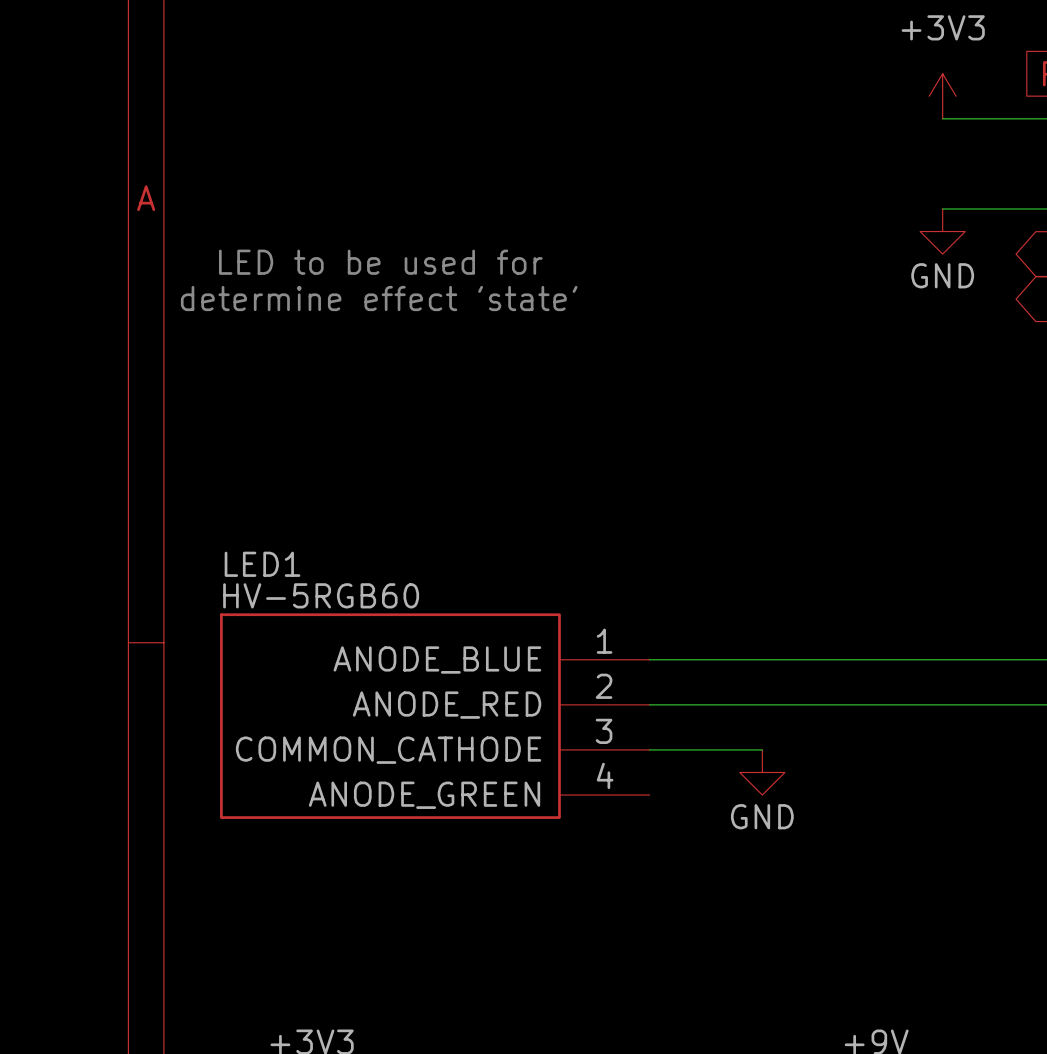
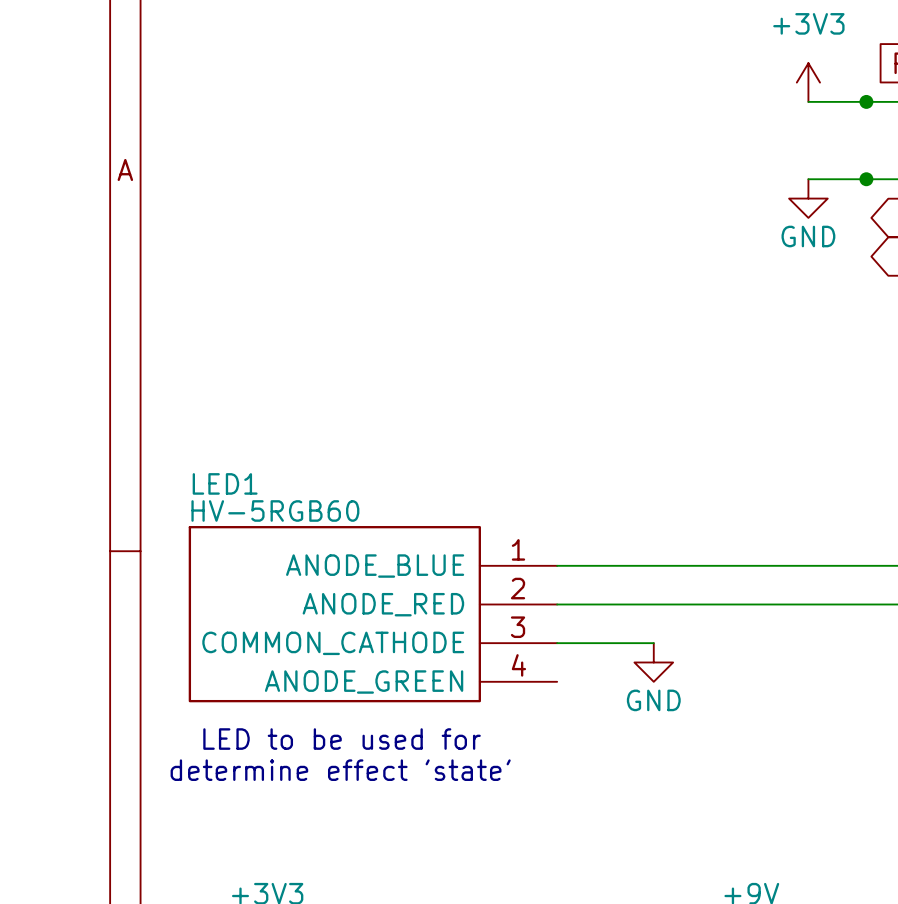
junction: none -> (866, 101)
junction: none -> (866, 179)
text: LED to be used for (380, 262) -> none
text: determine effect 'state' (379, 298) -> none
text: none -> LED to be used for (342, 739)
text: none -> determine effect 'state' (340, 770)

